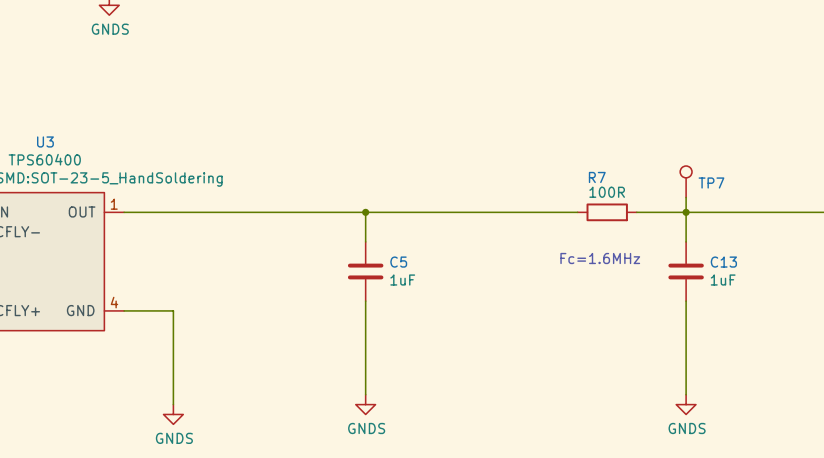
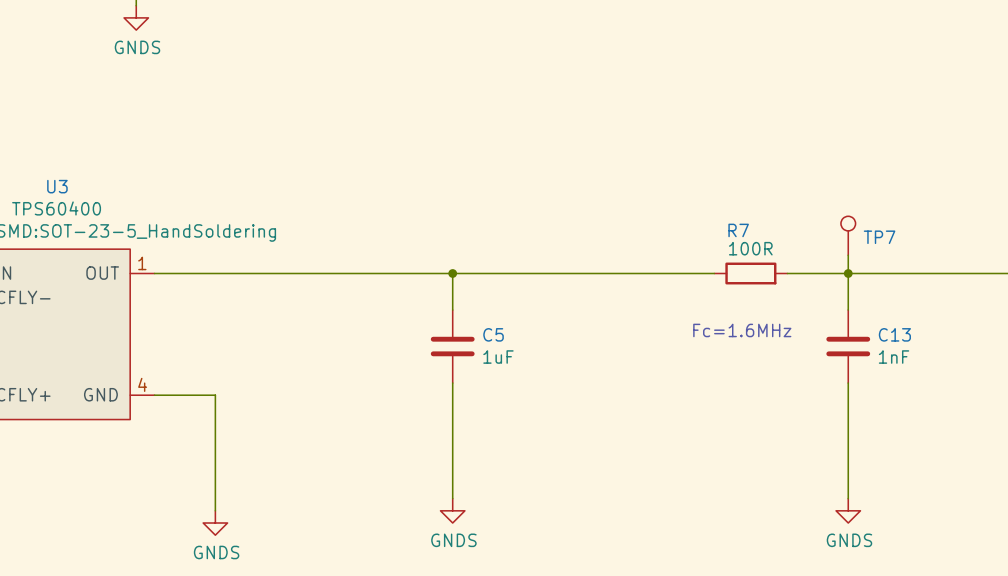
C13 value: 1uF (723, 280) -> 1nF (894, 357)

